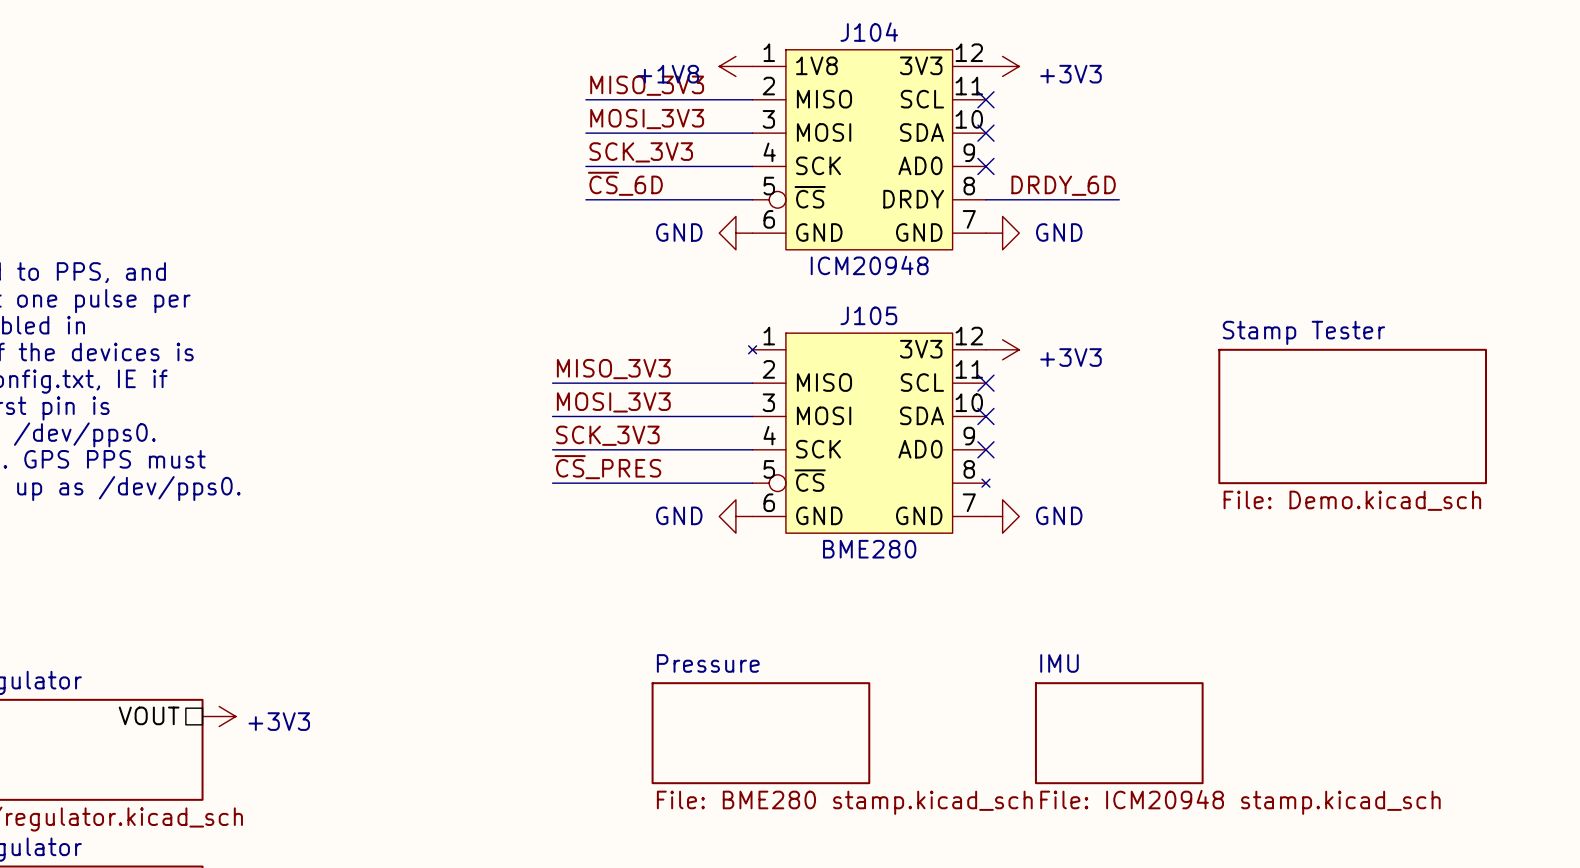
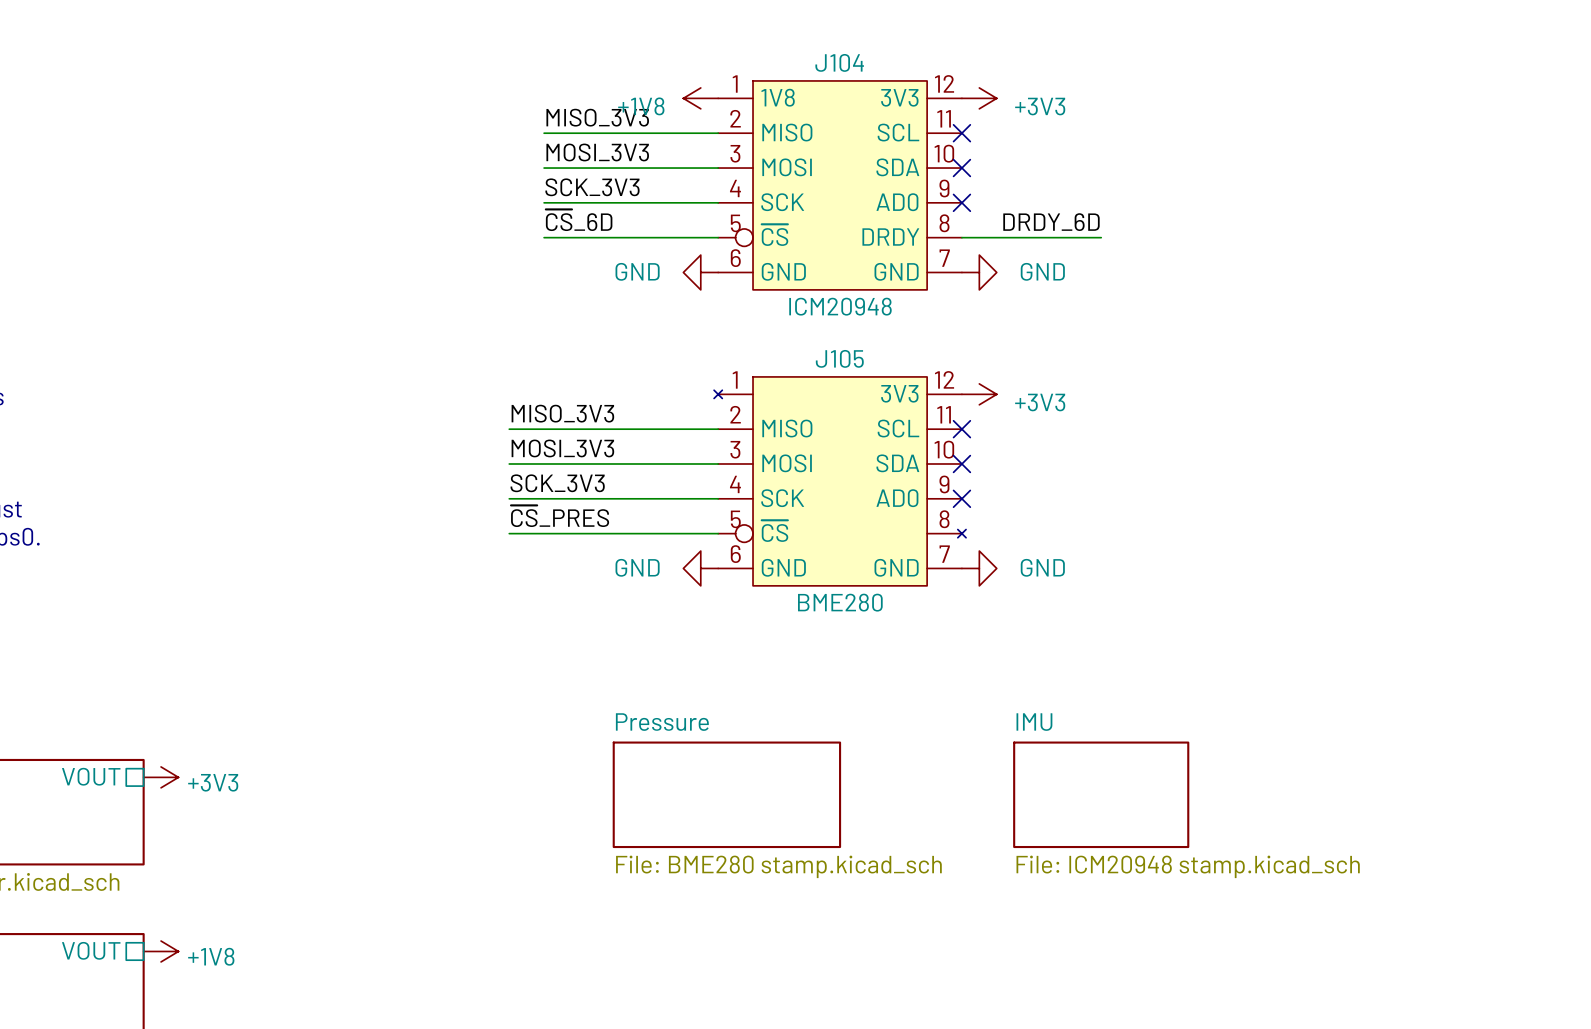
sheet Stamp Tester: File: Demo.kicad_sch (1352, 416) -> none

